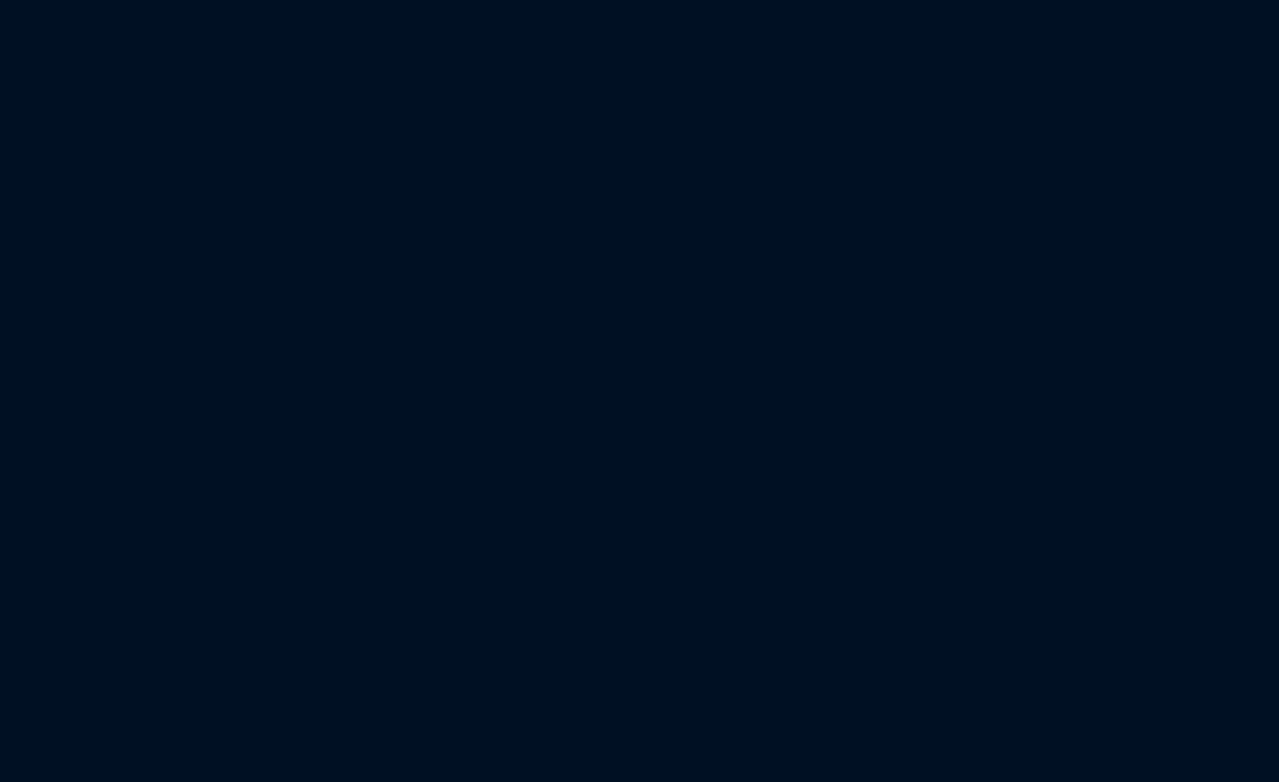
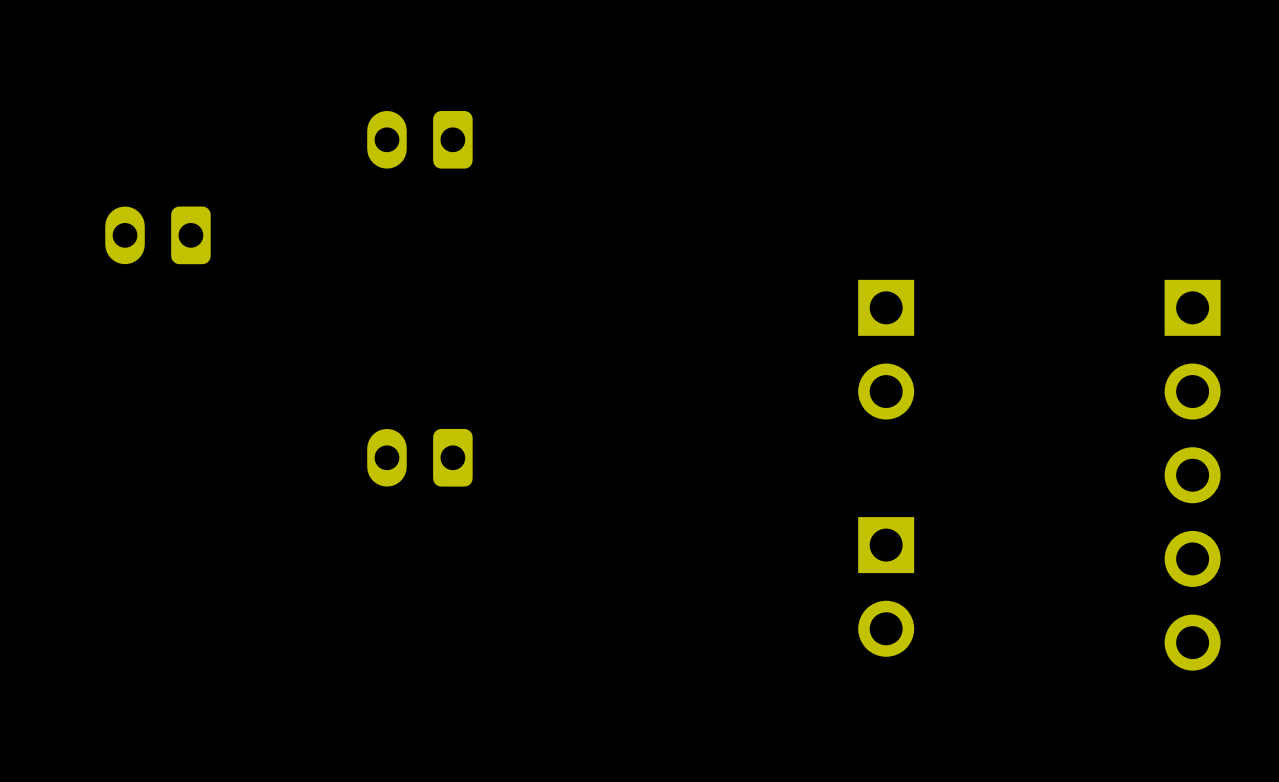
part: none -> (419, 139)
part: none -> (157, 235)
part: none -> (886, 349)
part: none -> (419, 457)
part: none -> (1192, 475)
part: none -> (886, 586)

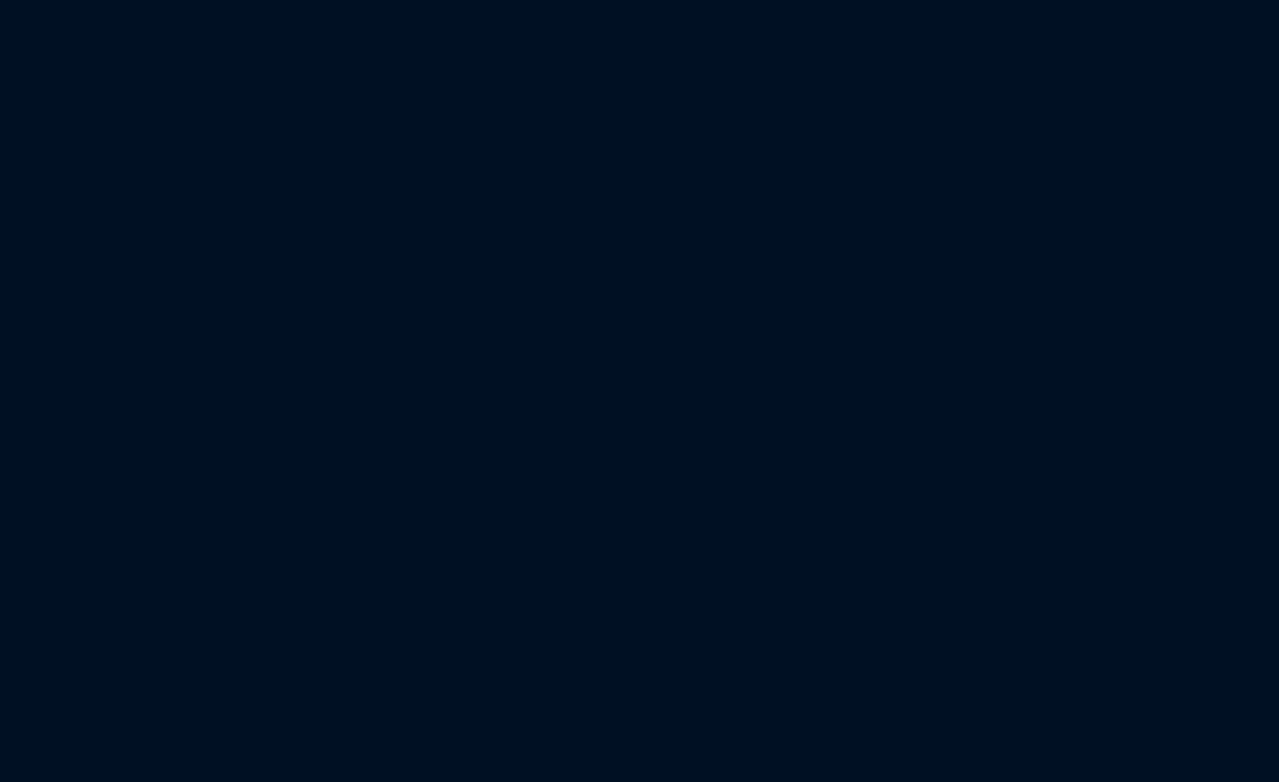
part: (419, 139) -> none
part: (157, 235) -> none
part: (886, 349) -> none
part: (419, 457) -> none
part: (1192, 475) -> none
part: (886, 586) -> none

